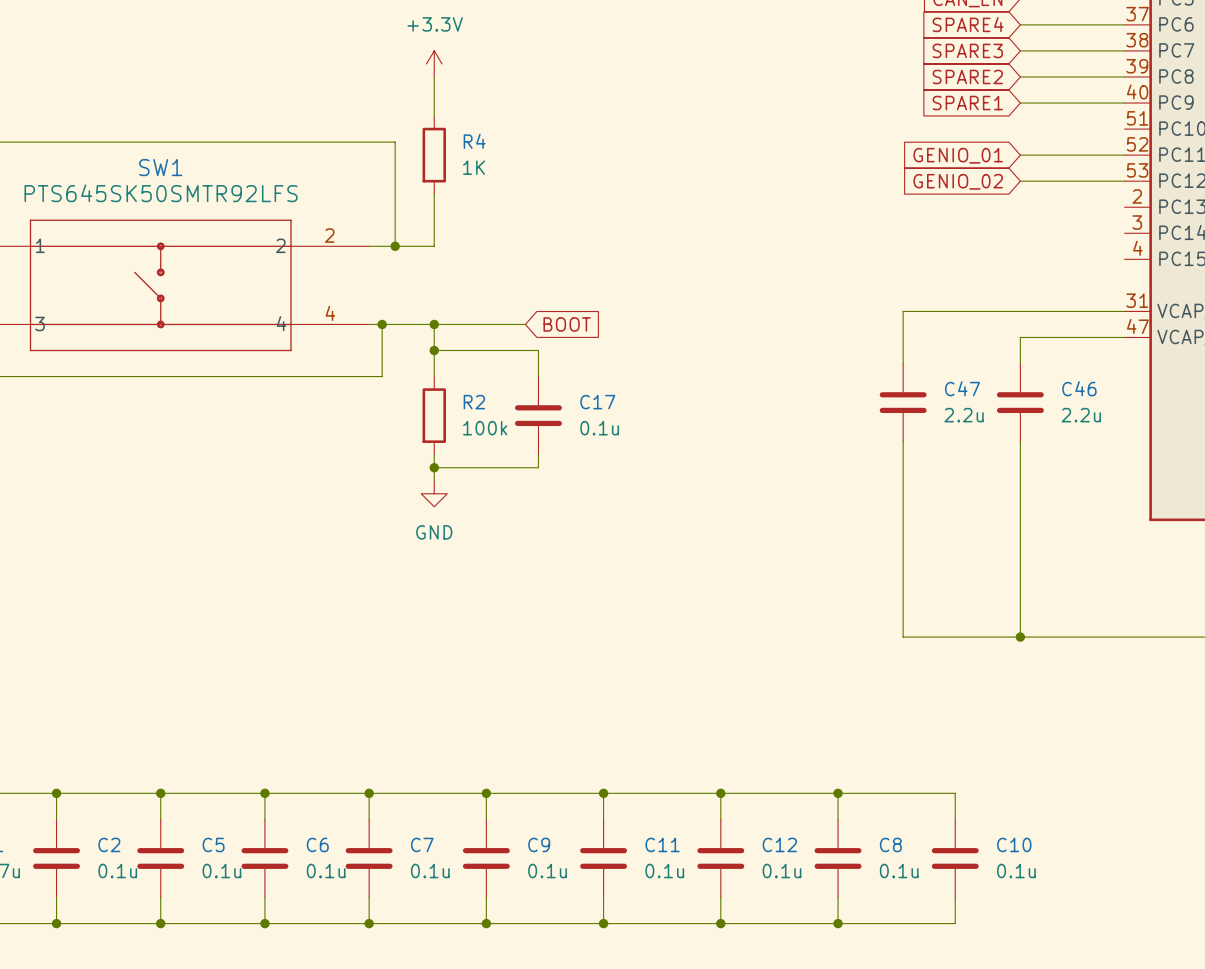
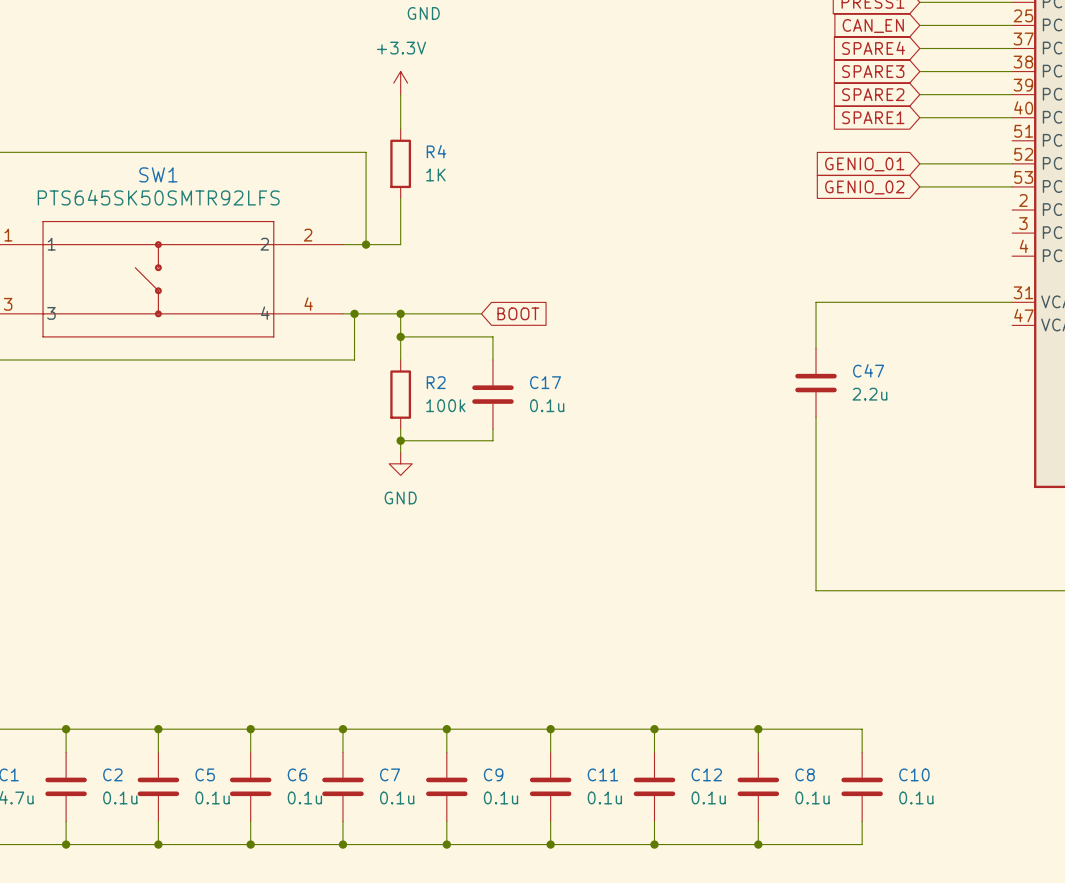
wire: (1124, 337) (1020, 337) (1020, 363) -> none
C46: 2.2u (1020, 402) -> none
wire: (1020, 441) (1020, 637) -> none
junction: (1020, 637) -> none

